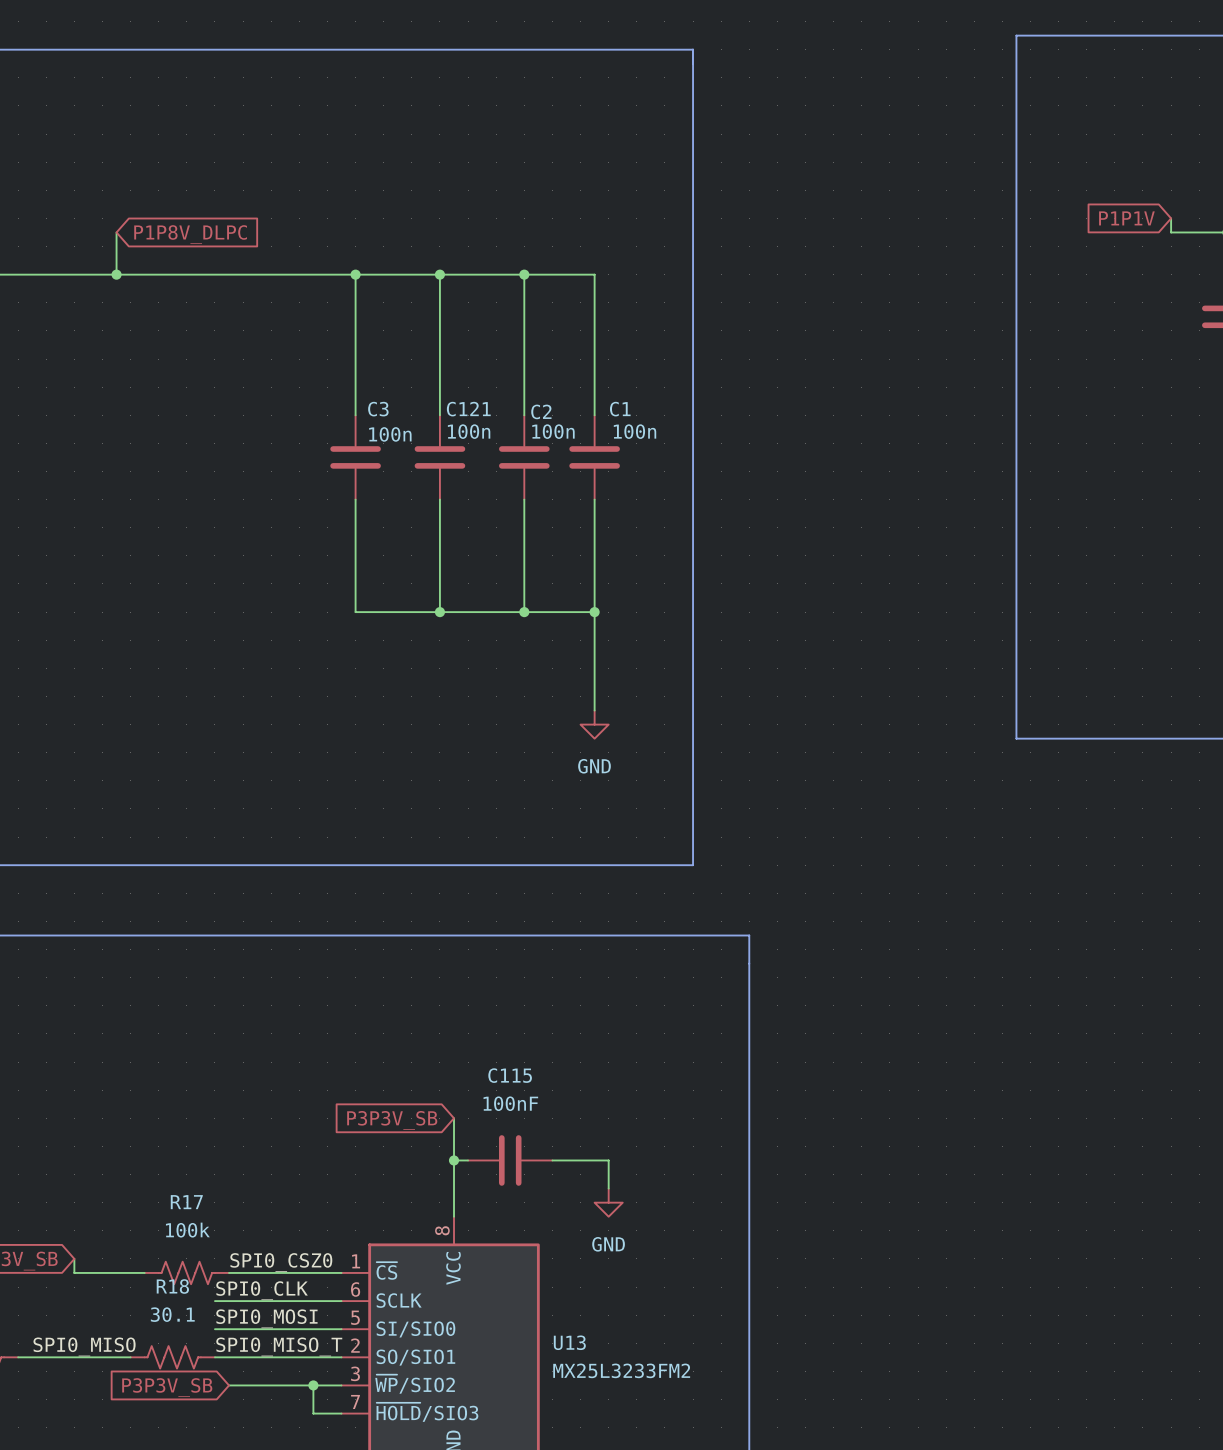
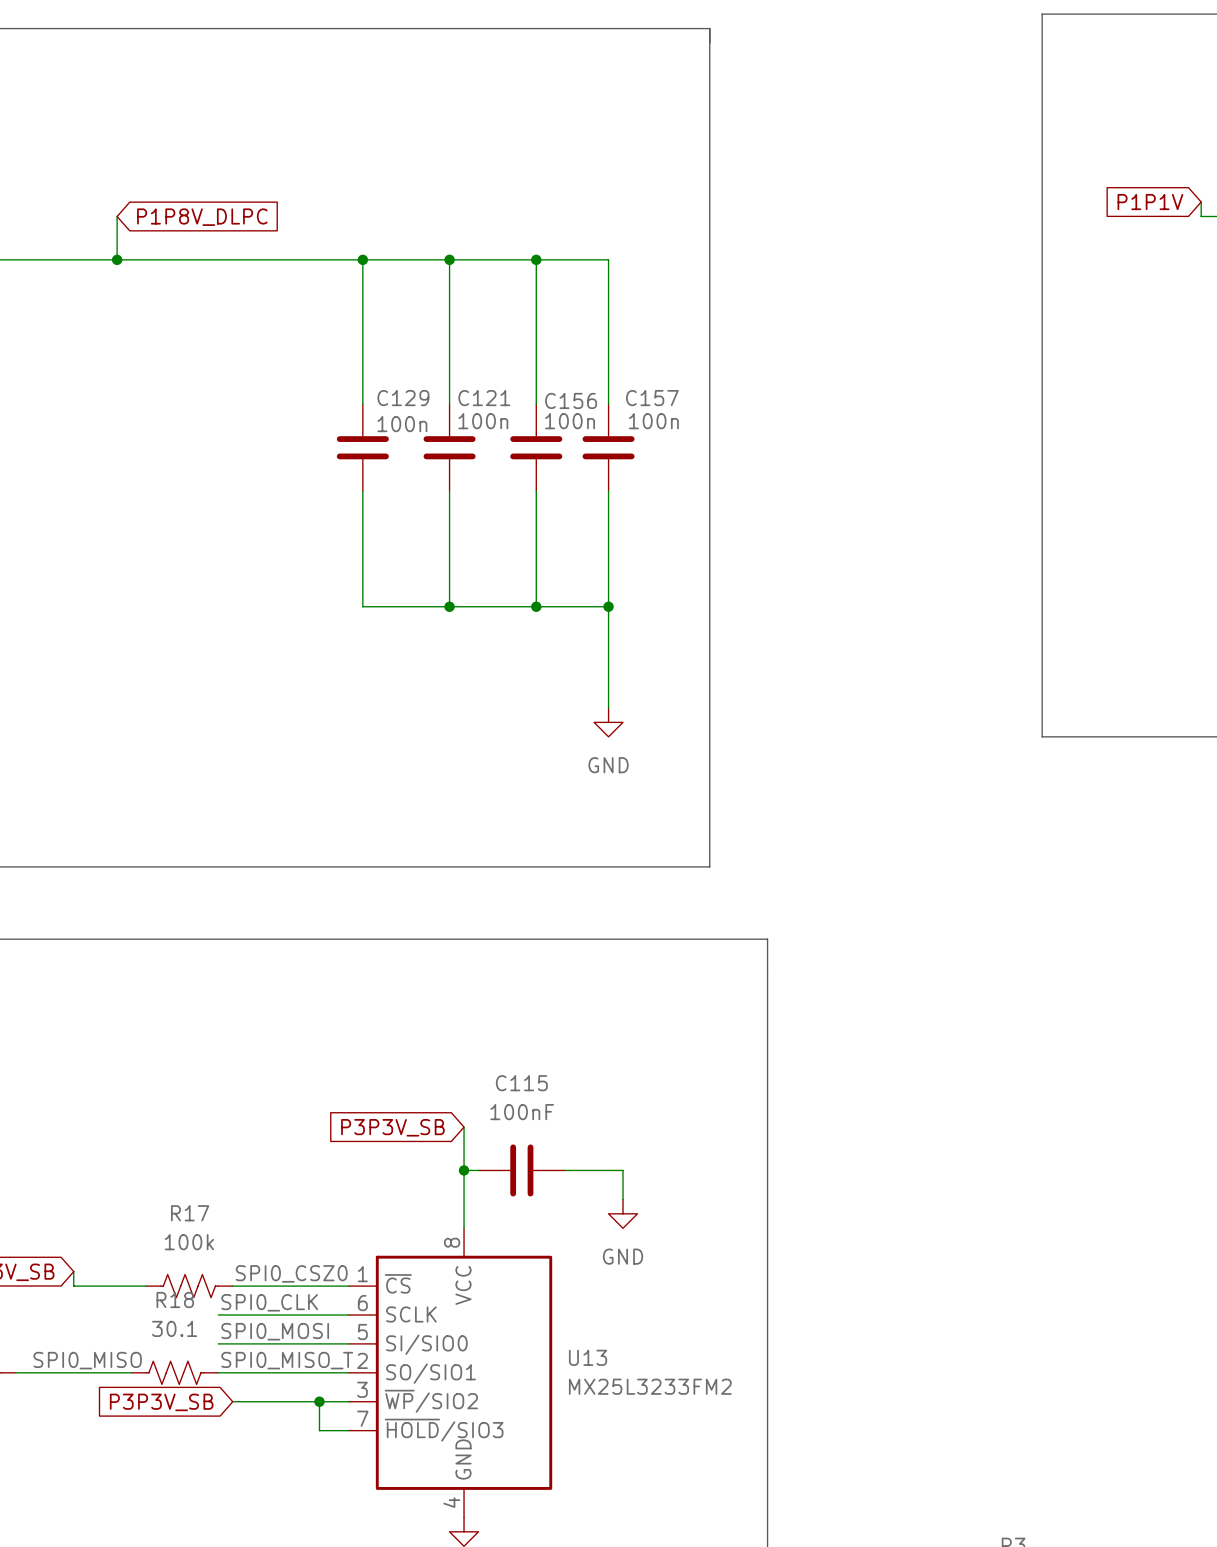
C3 name: C3 (378, 409) -> C129 (403, 398)
C1 name: C1 (620, 409) -> C157 (652, 398)
C2 name: C2 (541, 411) -> C156 (571, 400)

